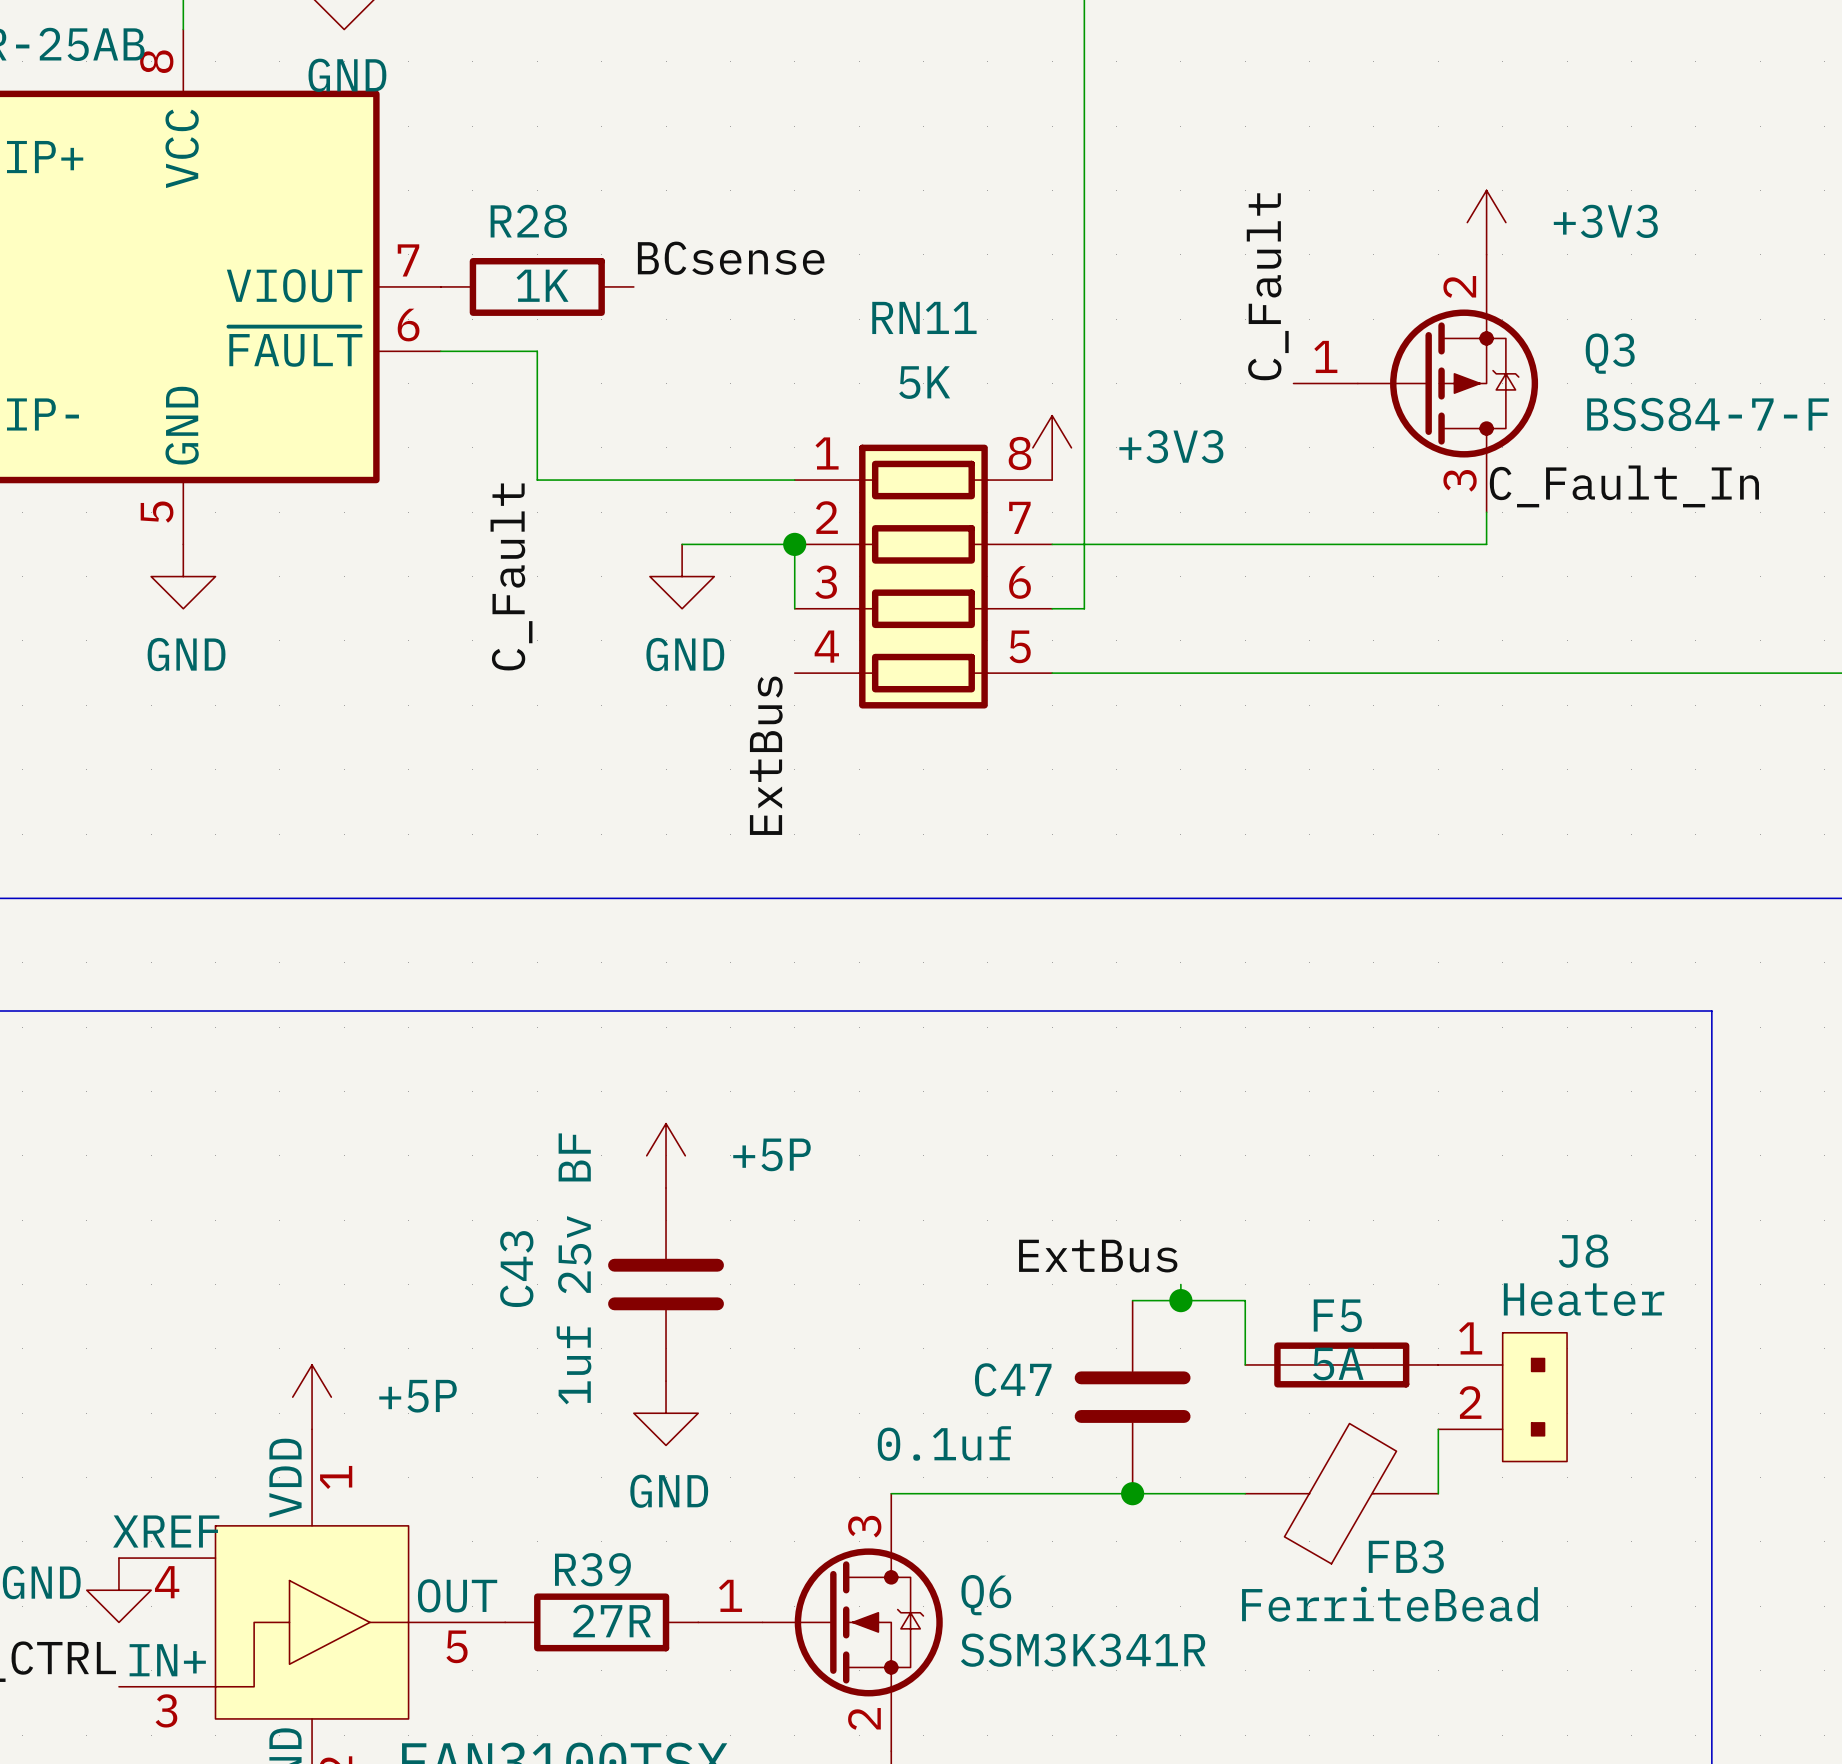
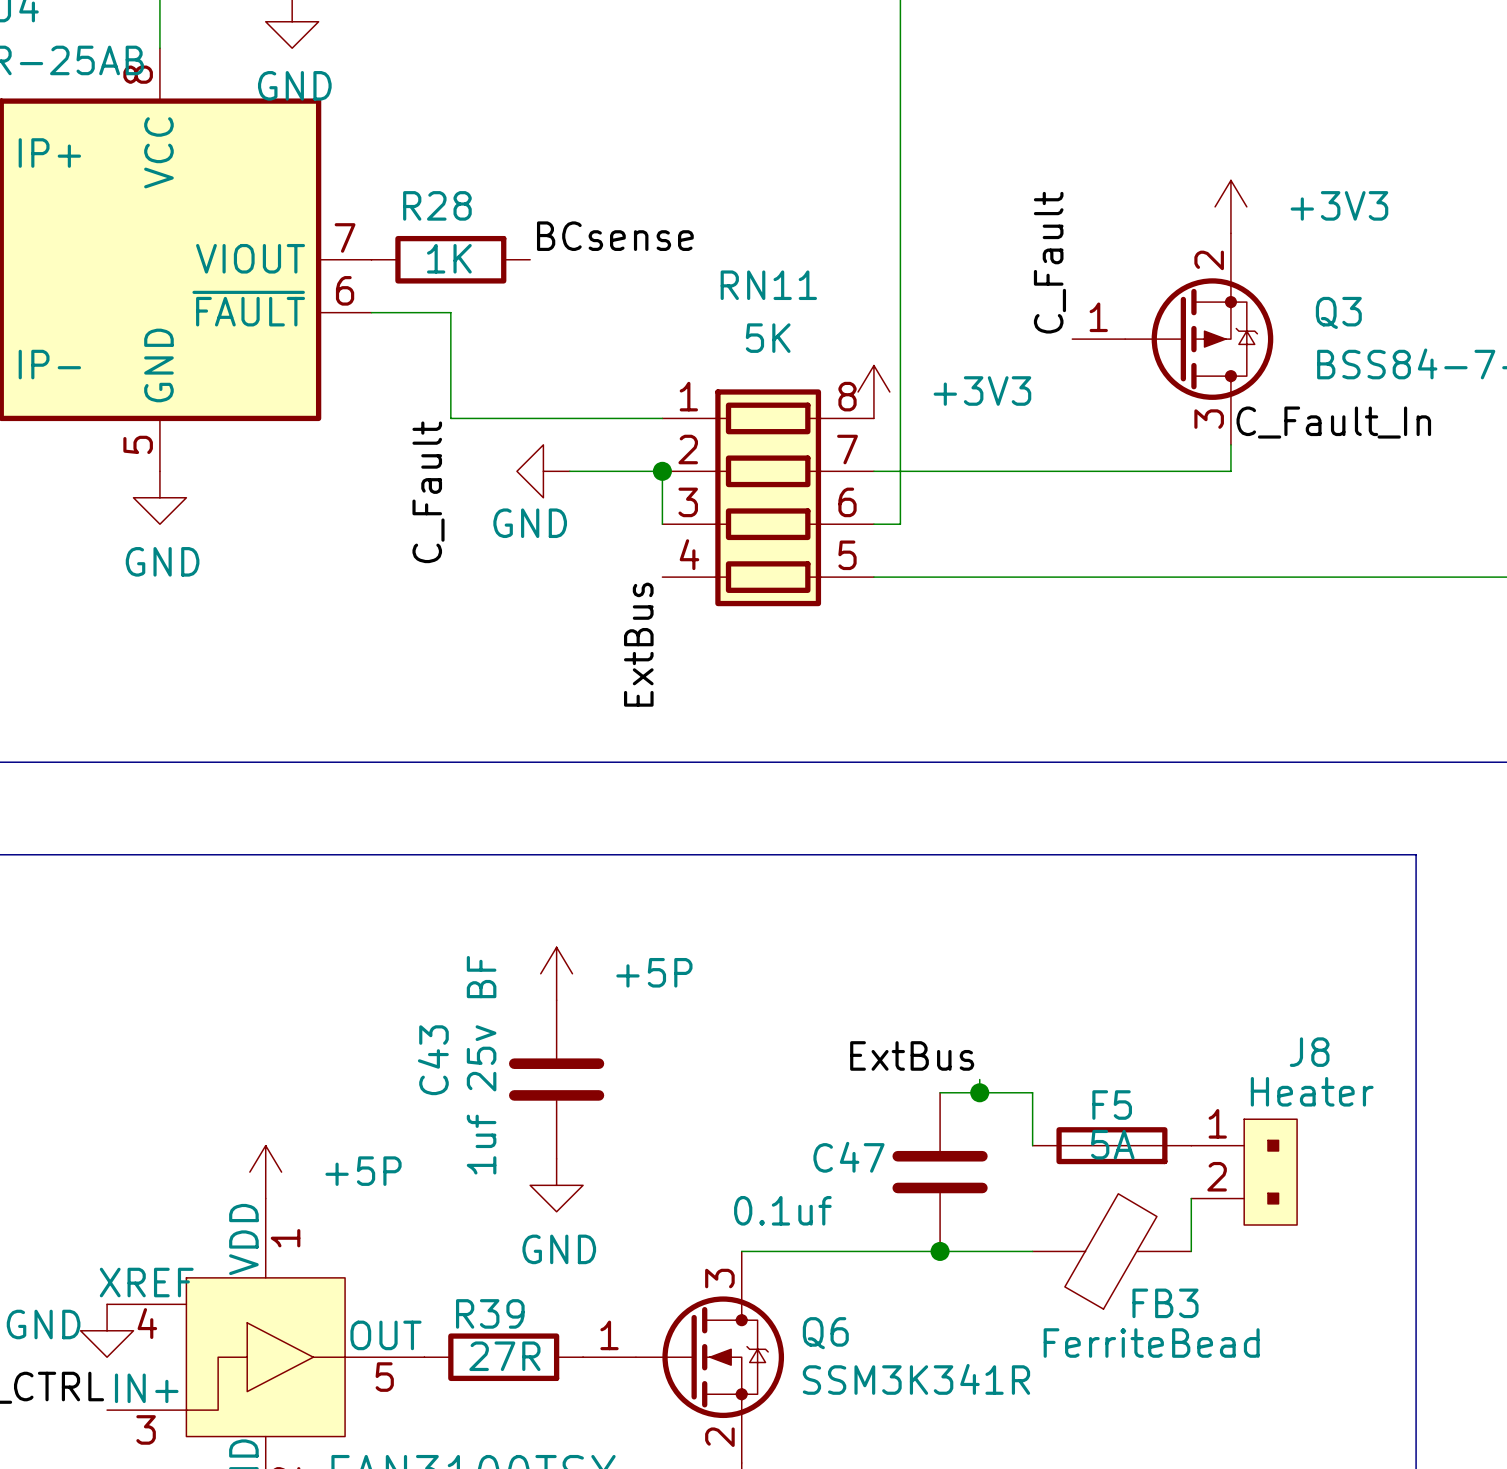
power symbol rotation: 0° (682, 576) -> 90° clockwise (543, 471)
power symbol position: GND (682, 576) -> GND (543, 471)

